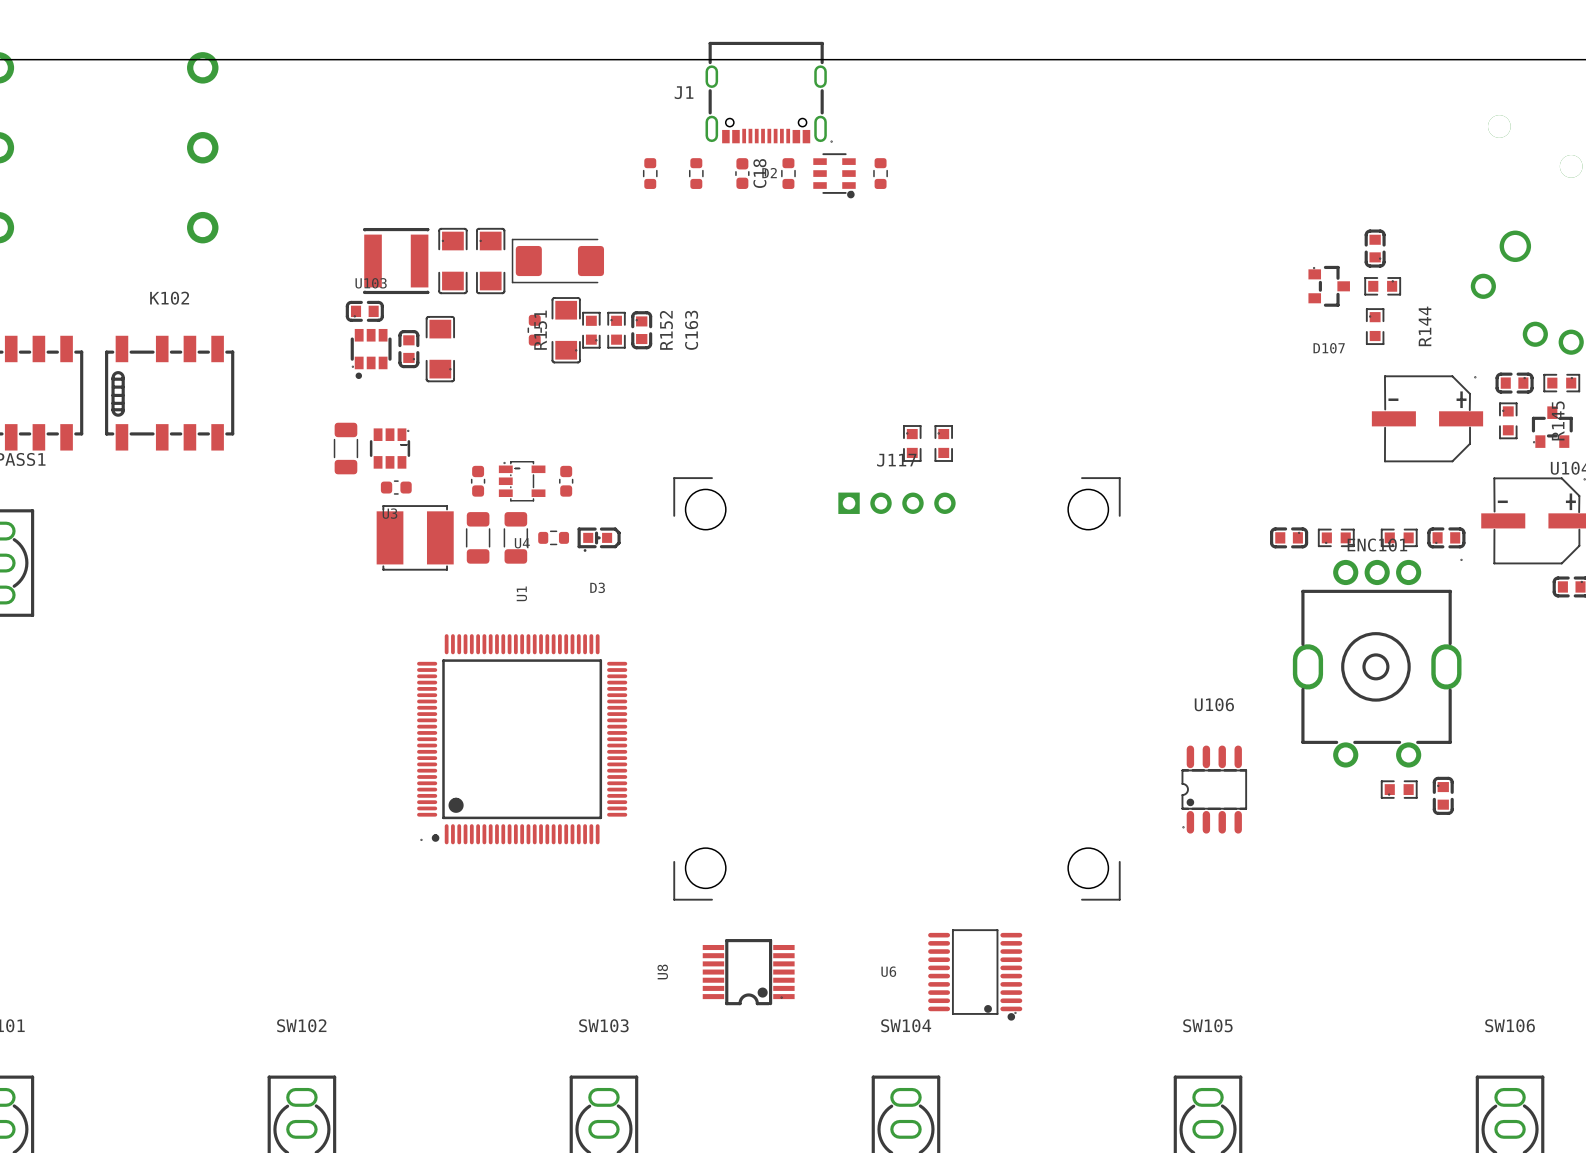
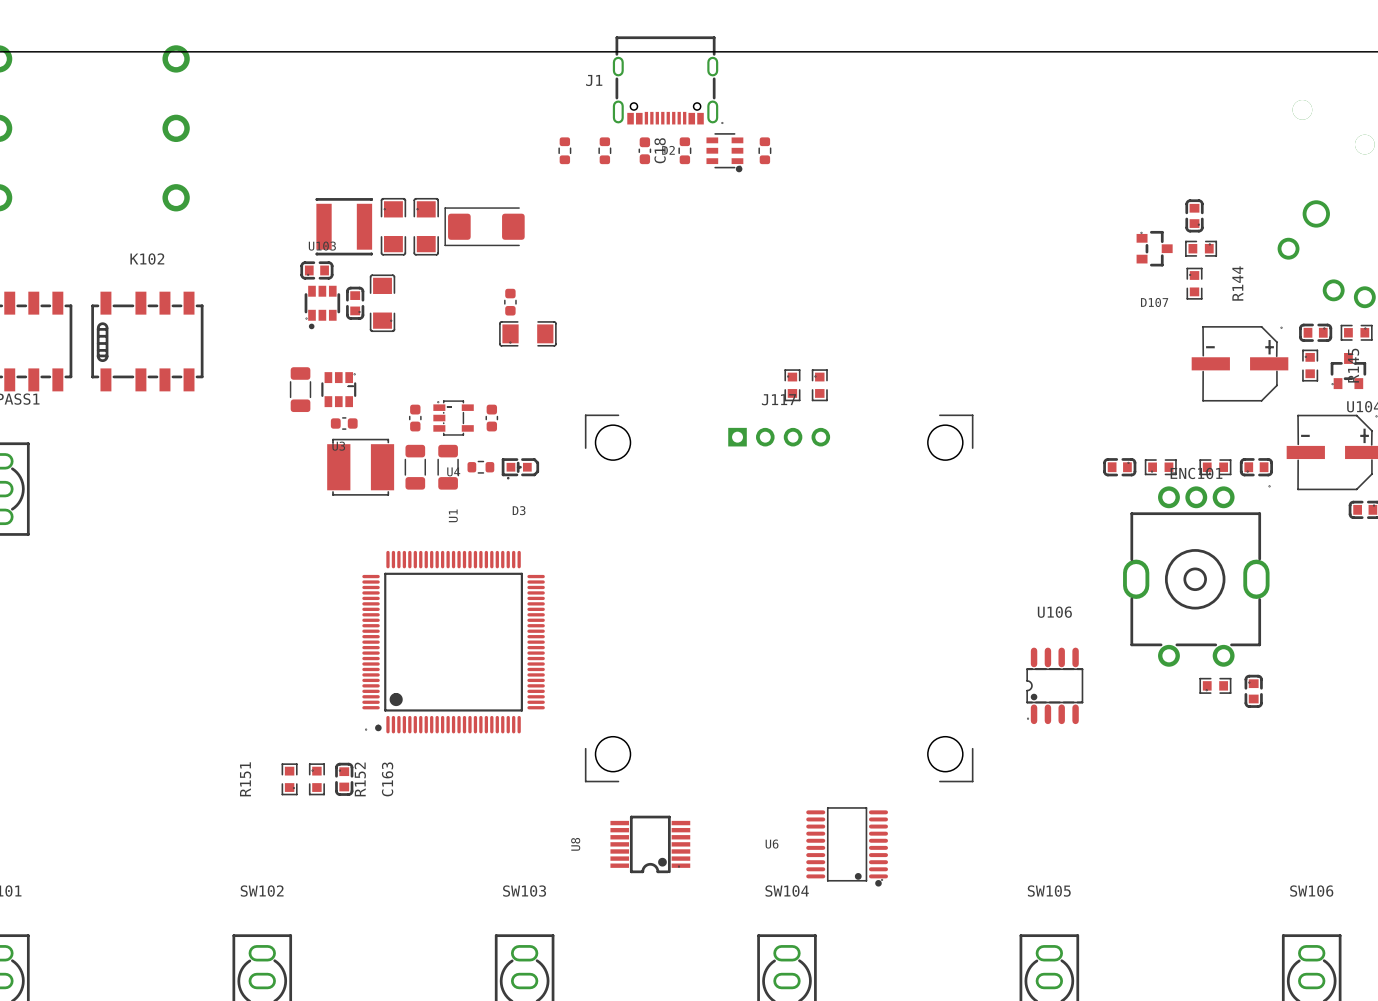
part position: (534, 330) -> (510, 302)
part rotation: 0° (566, 330) -> 90° clockwise (527, 333)
part position: (566, 330) -> (527, 333)
R151 position: (591, 330) -> (289, 779)
R152 position: (616, 330) -> (316, 779)
C163 position: (641, 330) -> (344, 779)

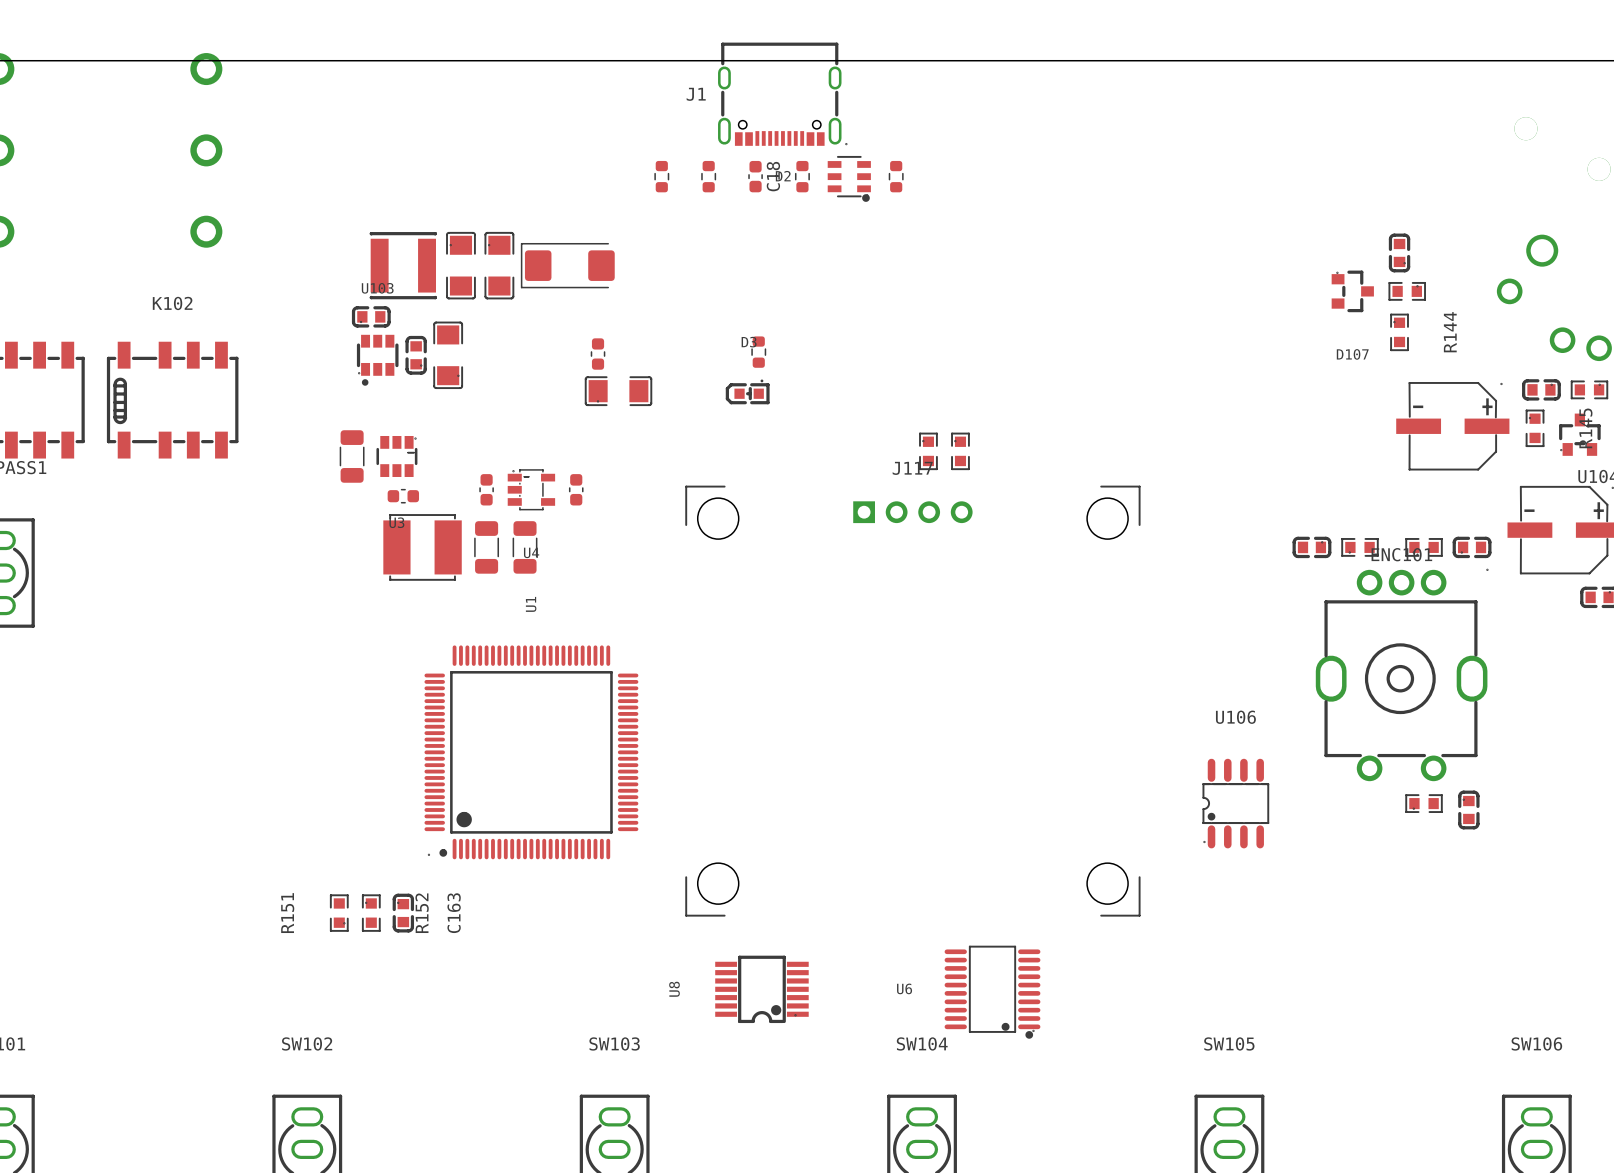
part rotation: 0° (480, 467) -> 90° clockwise (758, 352)
part position: (480, 467) -> (758, 352)
D3 rotation: 0° (520, 468) -> 180° (747, 391)
D3 position: (520, 468) -> (747, 391)

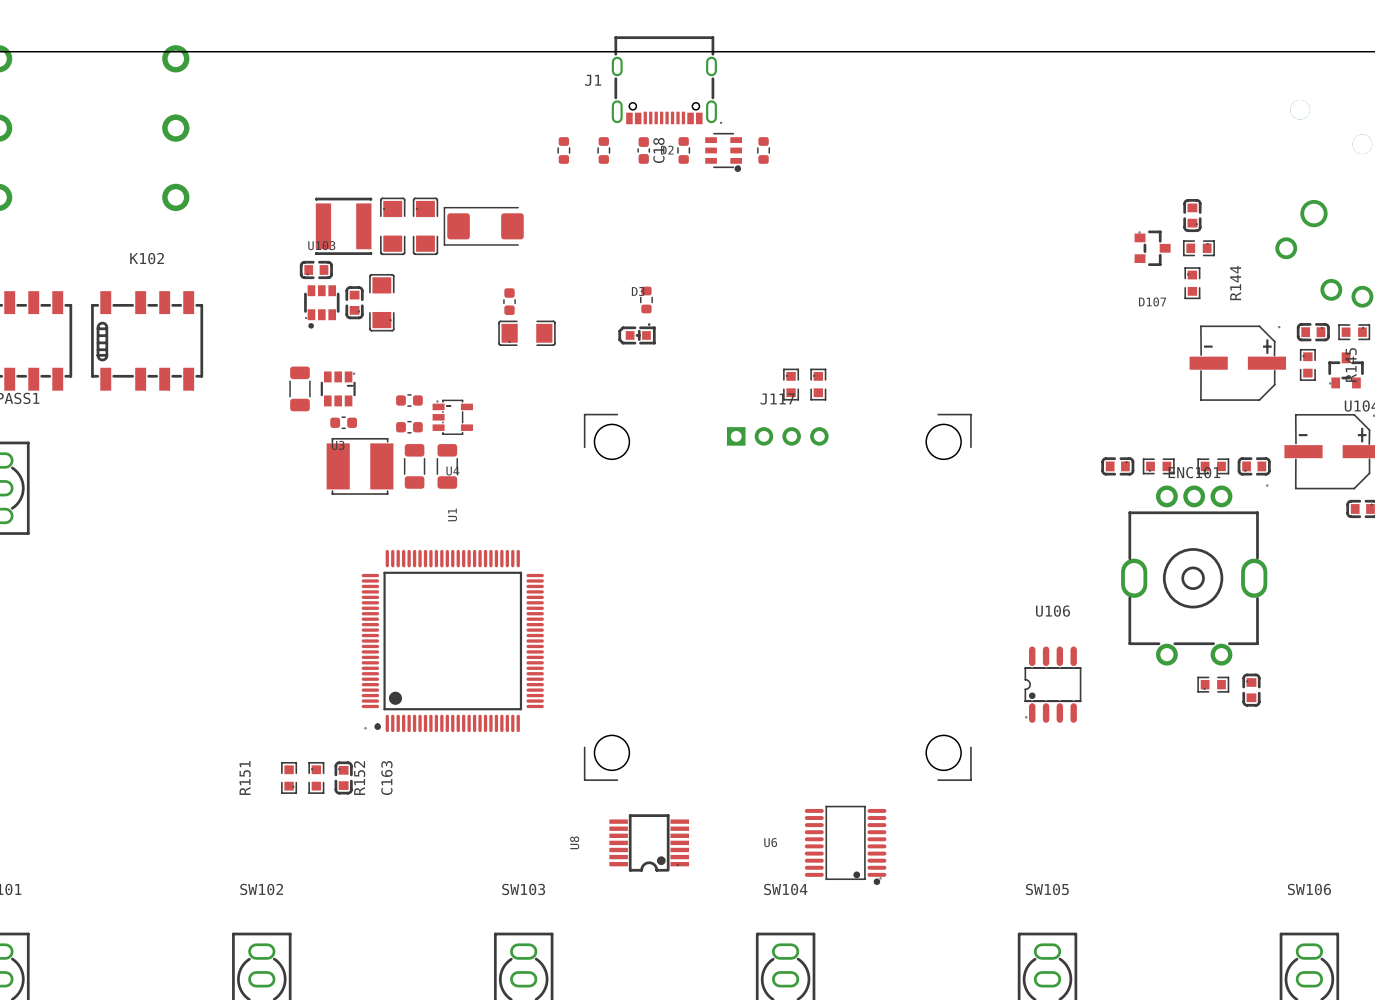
part: none -> (409, 400)
part: (486, 489) -> none
part: (576, 489) -> none
part: none -> (409, 427)

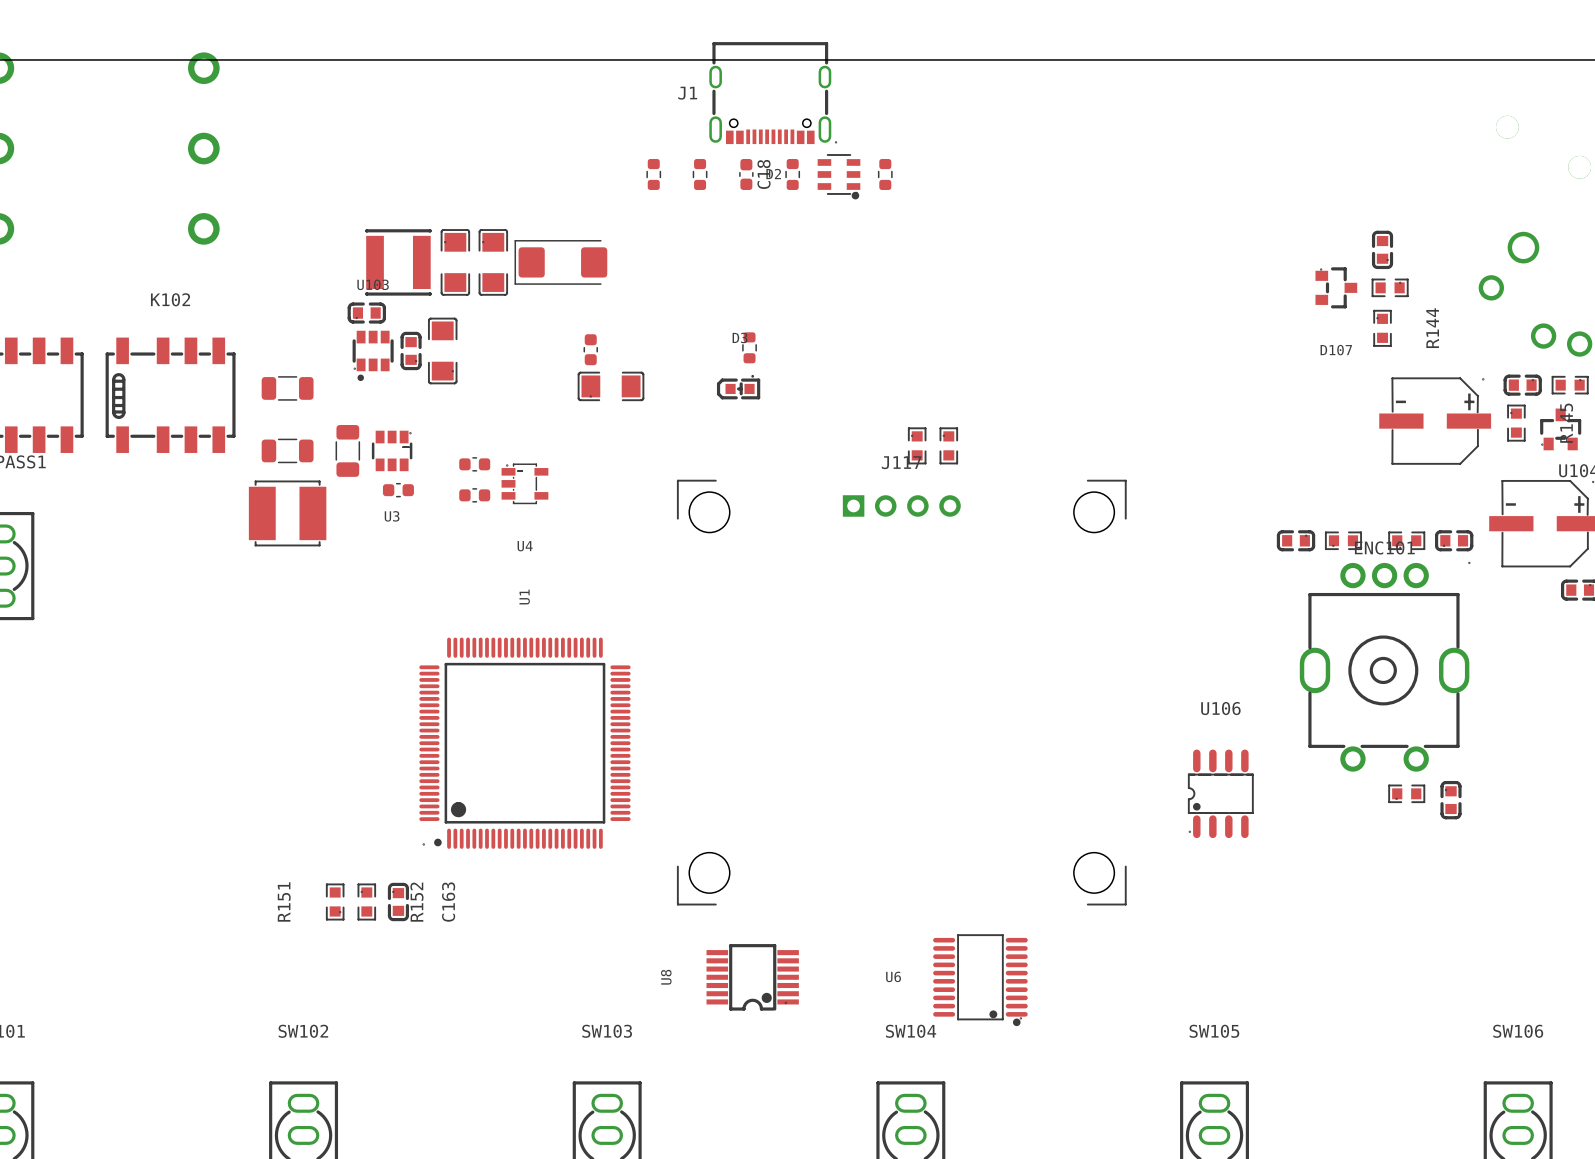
part: none -> (287, 388)
part: none -> (287, 450)
part rotation: 0° (360, 466) -> 180° (287, 513)
part position: (360, 466) -> (287, 513)
part: (414, 466) -> none
part: (447, 466) -> none

